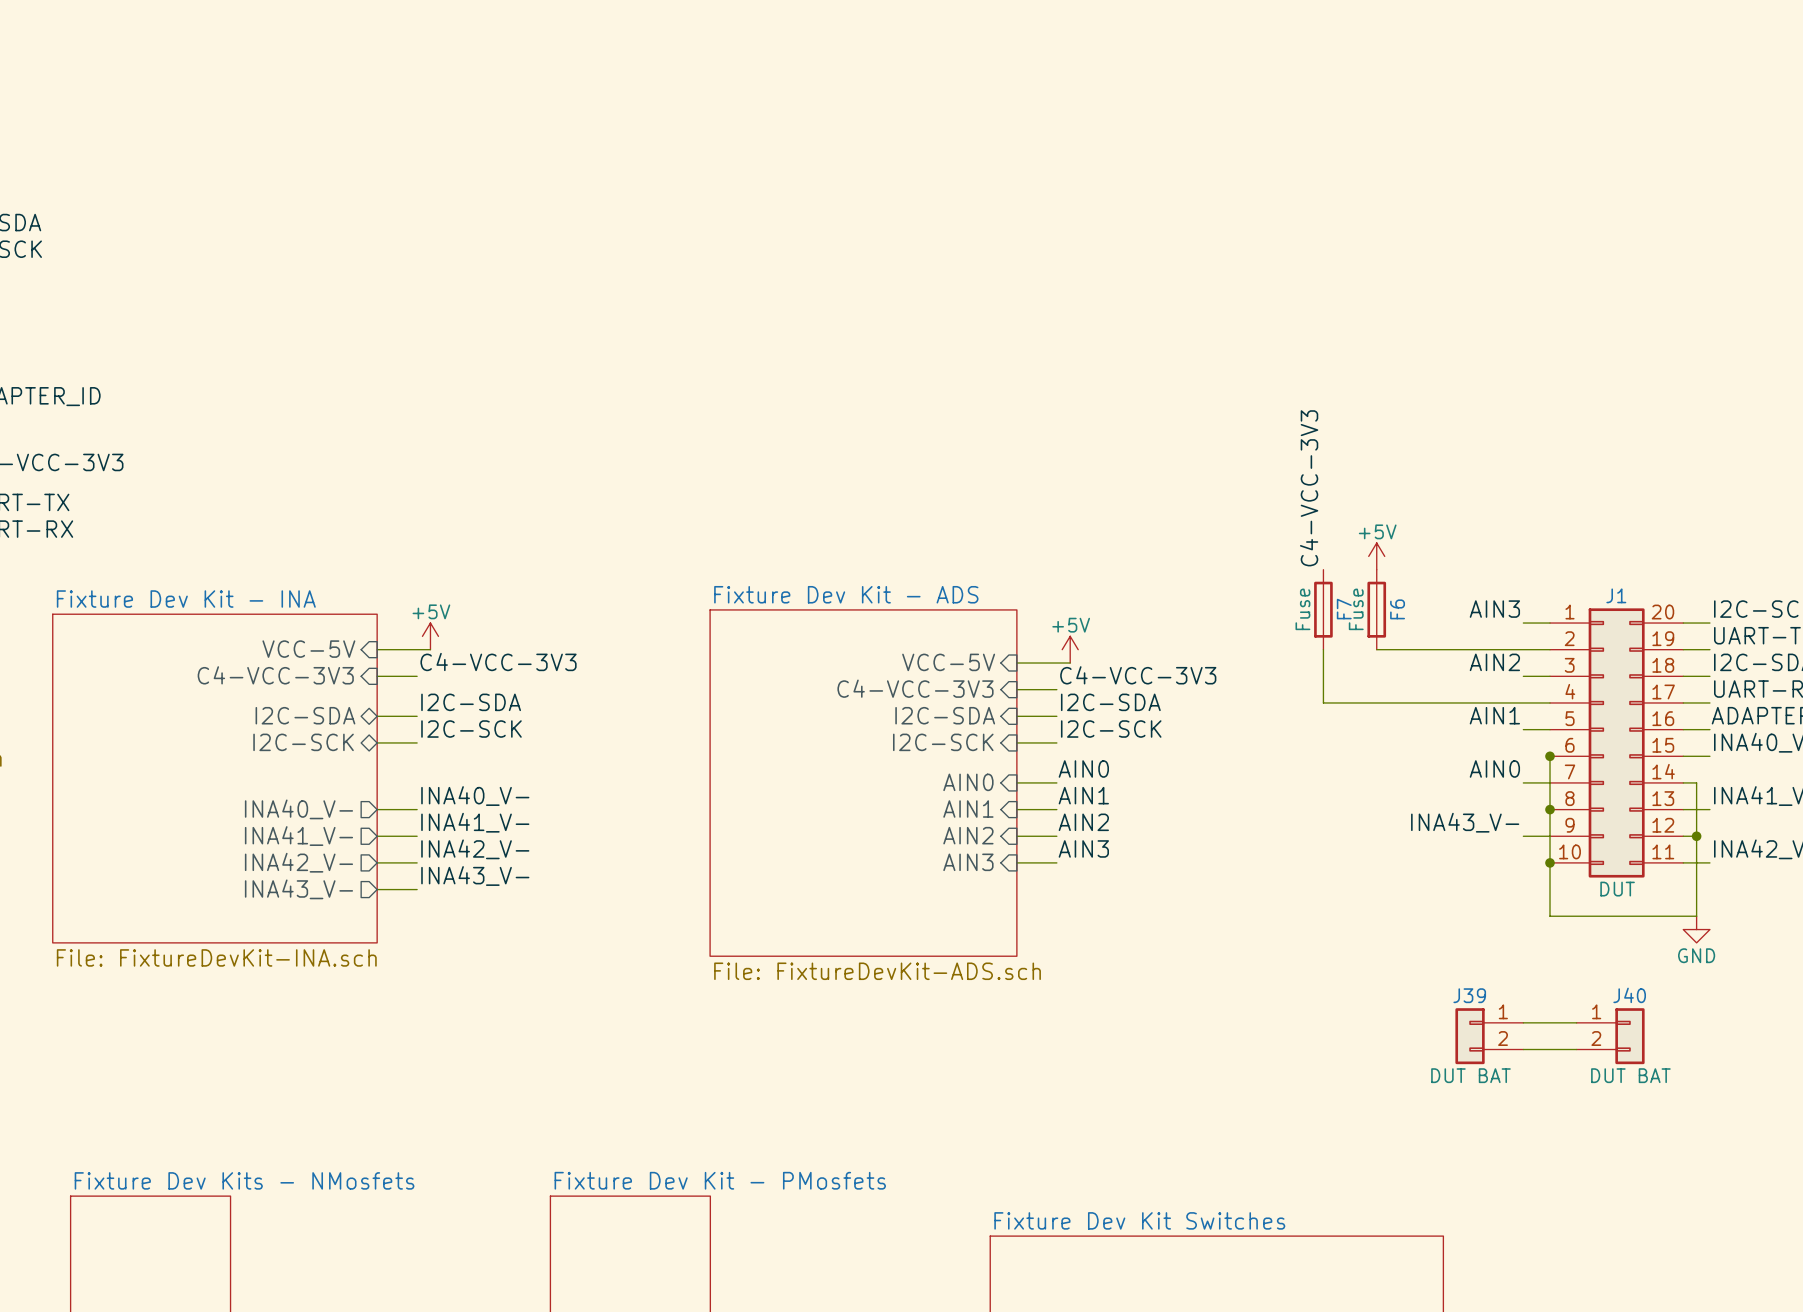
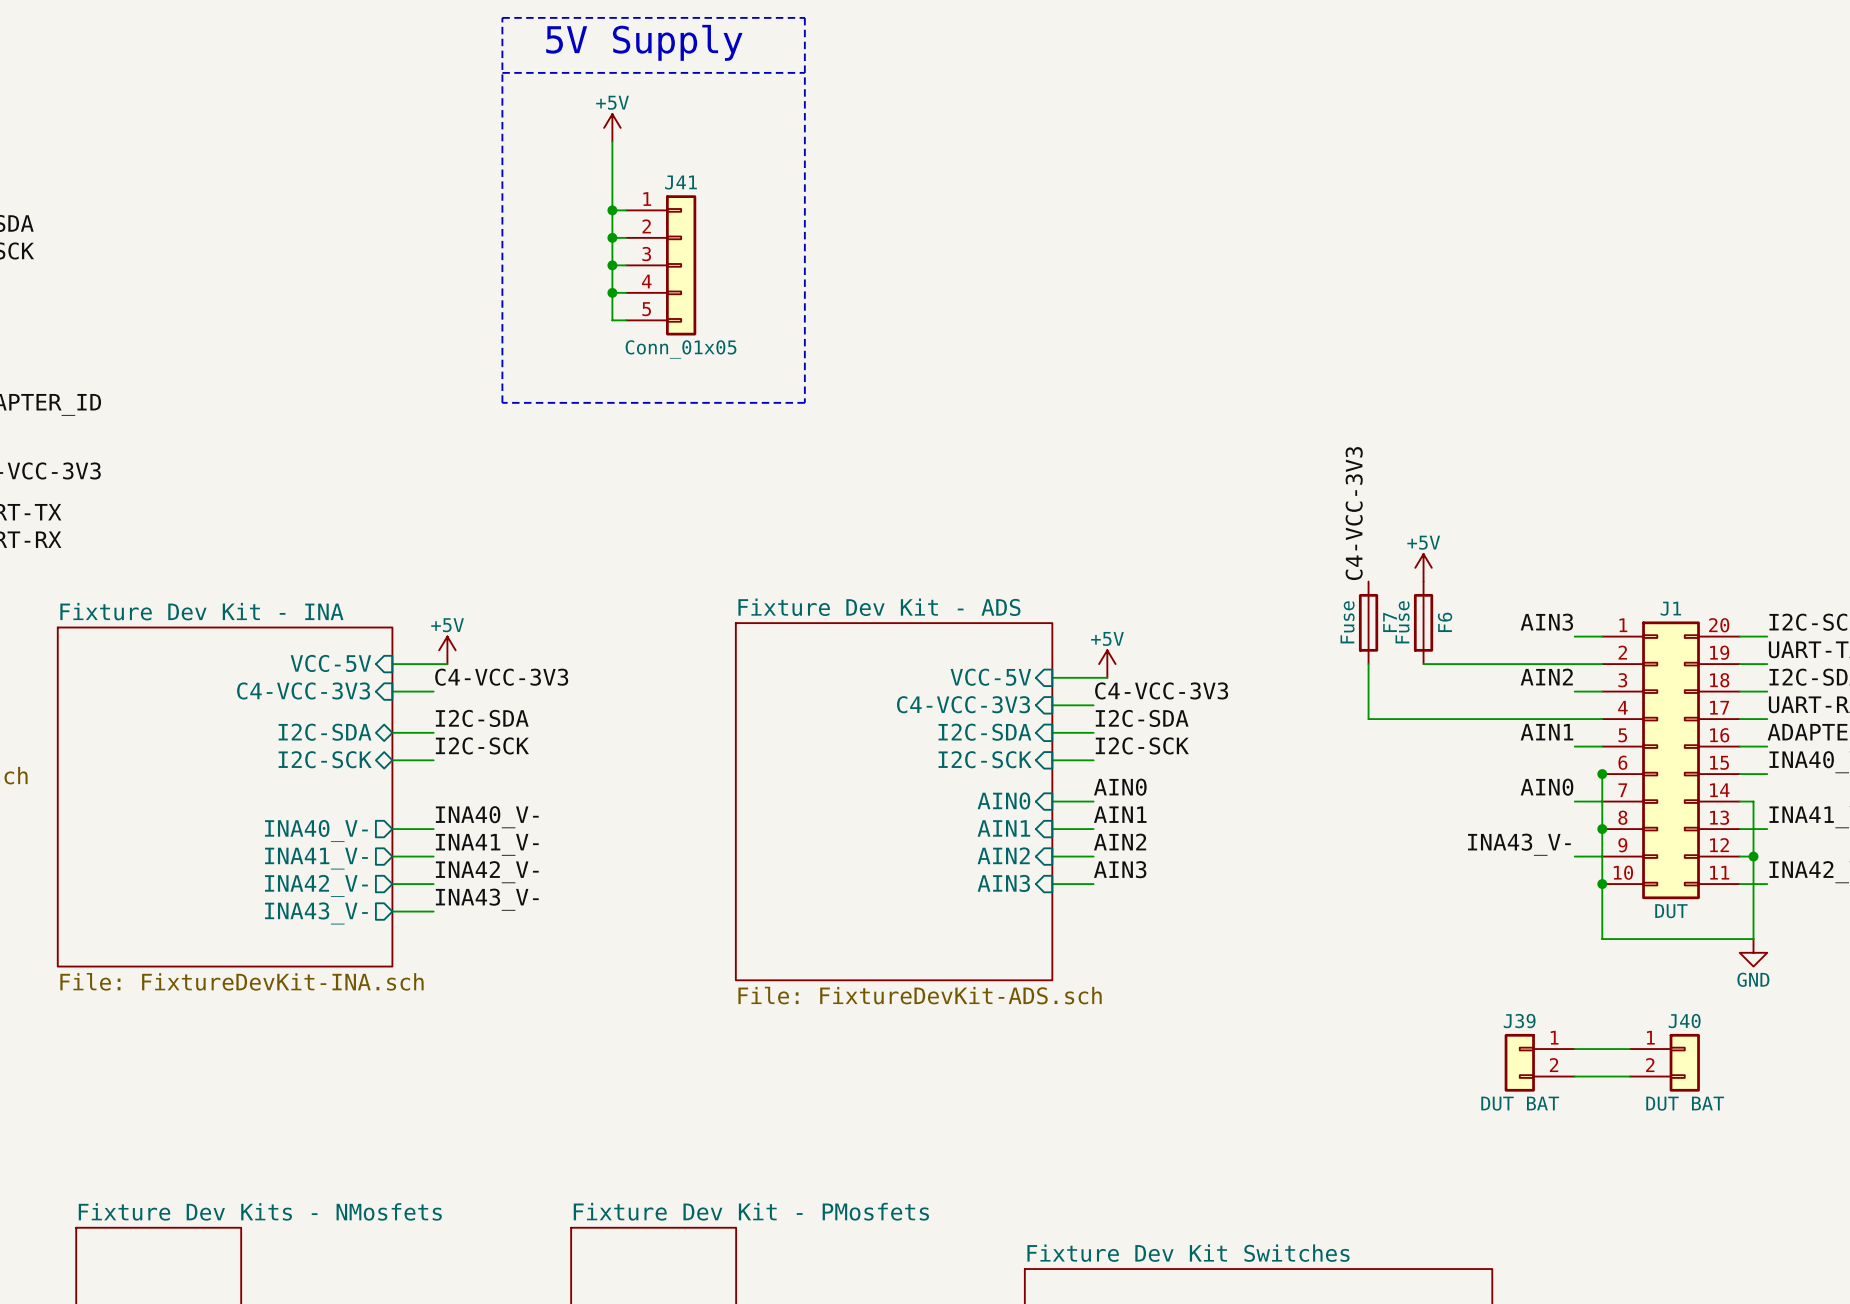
line: none -> (502, 17) (502, 402) (804, 402) (804, 17) (502, 17)
text: none -> 5V Supply (644, 42)
line: none -> (502, 72) (804, 72)
power symbol: none -> +5V (612, 127)
wire: none -> (612, 141) (612, 320) (626, 320)
wire: none -> (612, 210) (626, 210)
junction: none -> (612, 210)
wire: none -> (612, 237) (626, 237)
junction: none -> (612, 237)
wire: none -> (612, 265) (626, 265)
junction: none -> (612, 265)
J41: none -> Conn_01x05 (661, 265)
wire: none -> (612, 292) (626, 292)
junction: none -> (612, 292)

